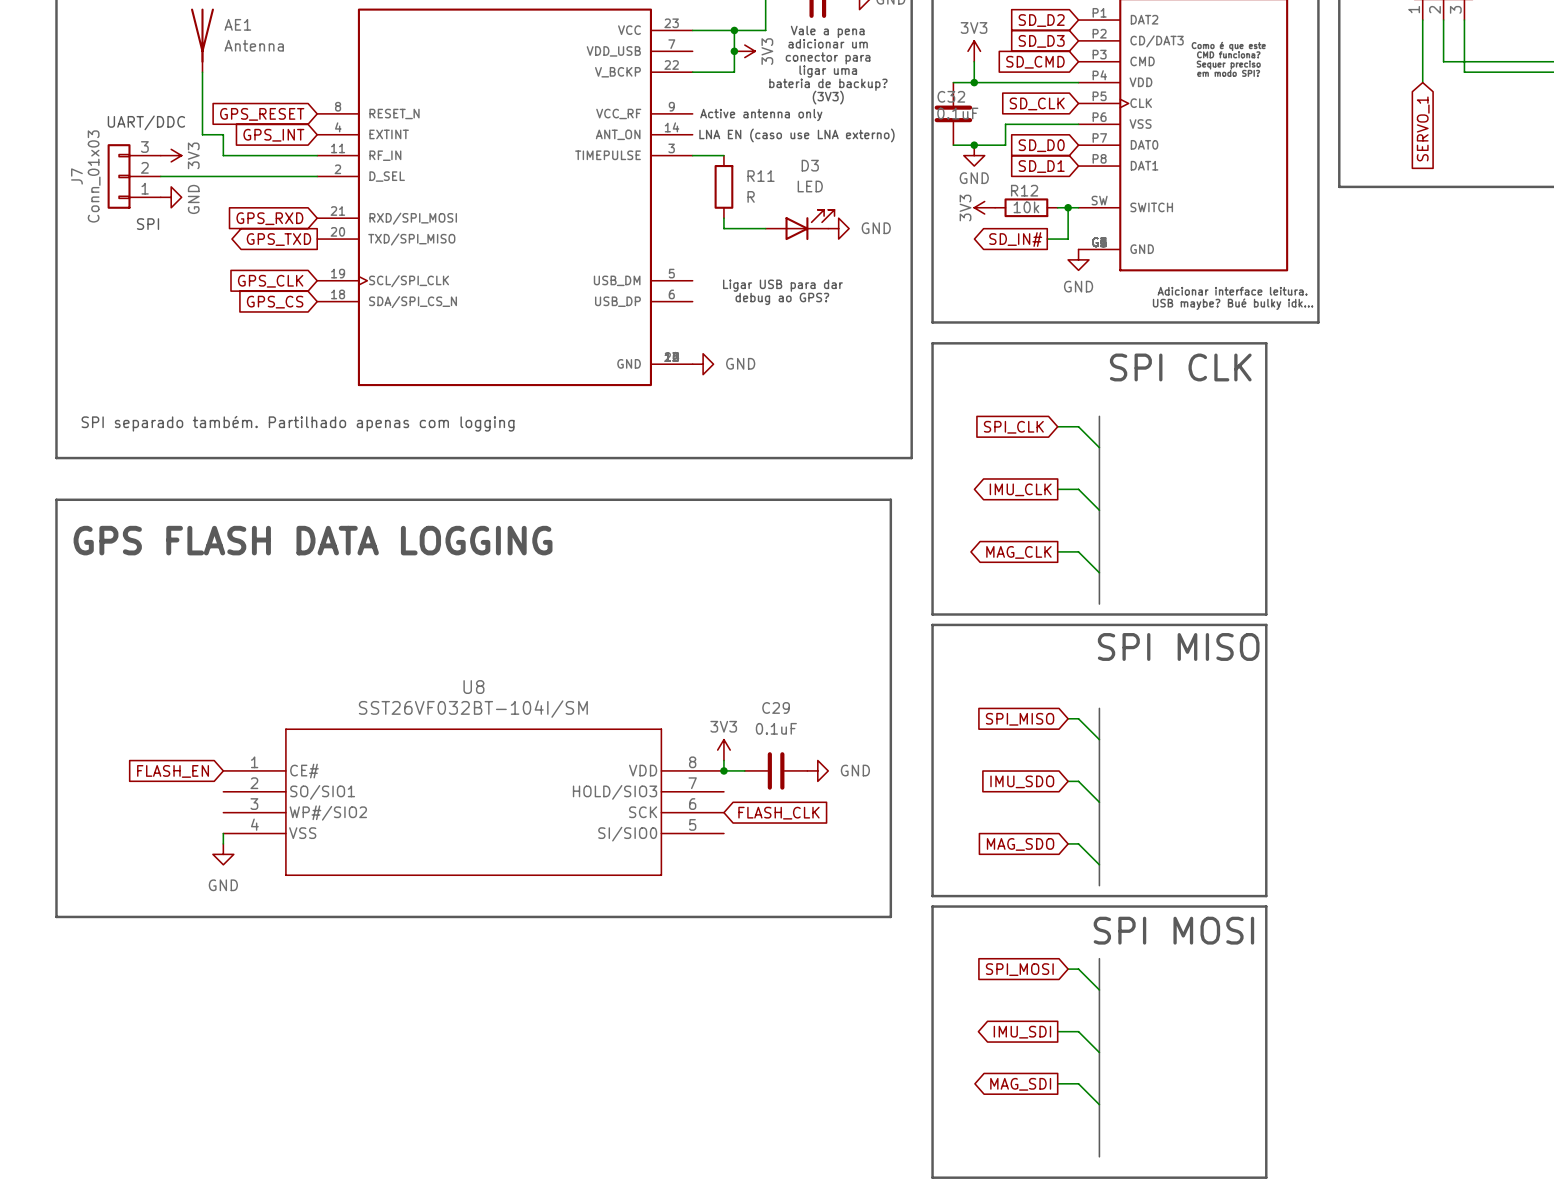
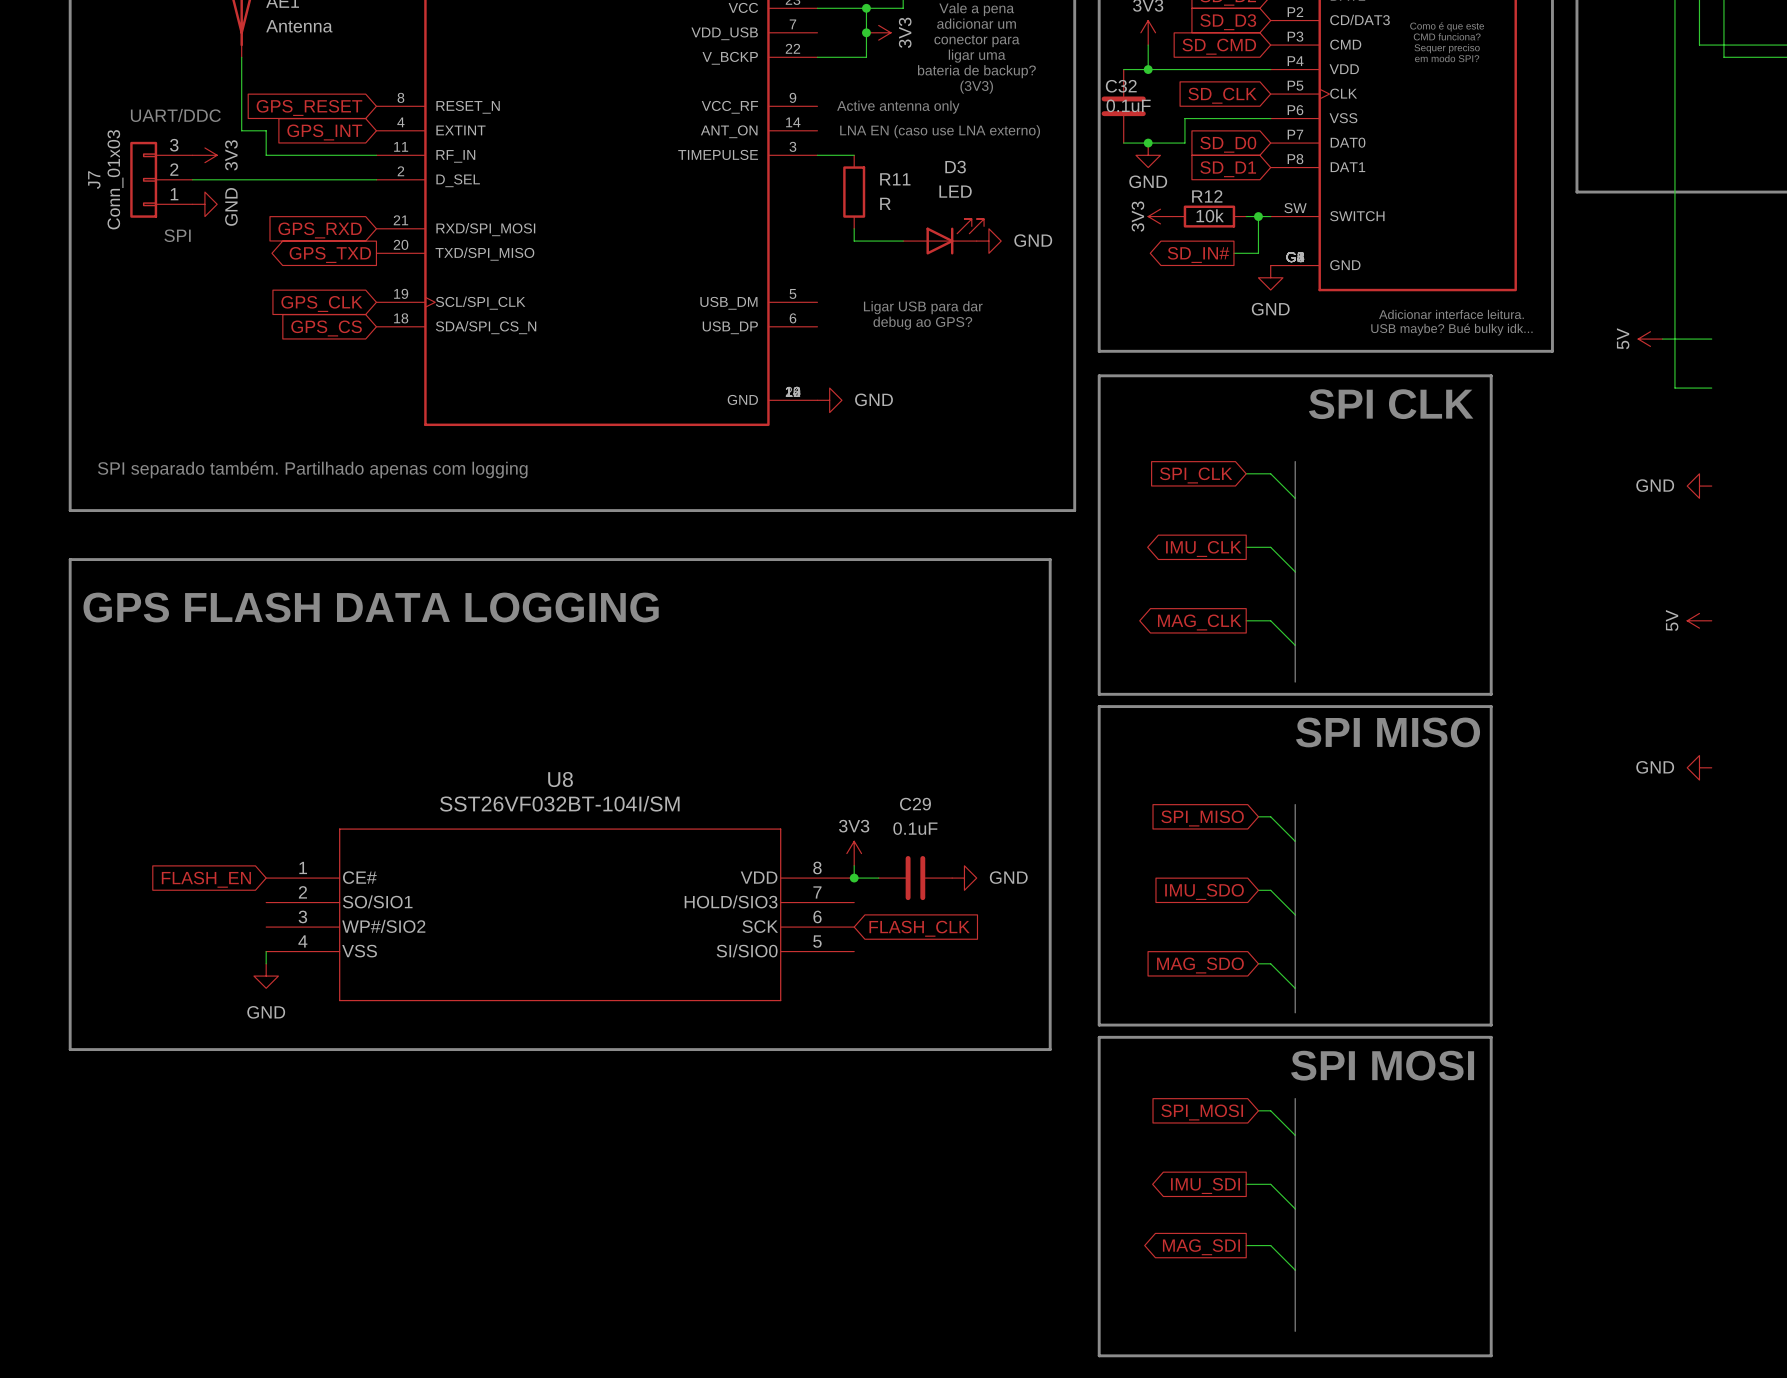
wire: none -> (1674, 69) (1674, 388) (1711, 388)
global label: SERVO_1 (1423, 128) -> none
power symbol: none -> 5V (1650, 339)
wire: none -> (1662, 339) (1711, 339)
power symbol: none -> GND (1699, 486)
power symbol: none -> 5V (1699, 620)
power symbol: none -> GND (1699, 767)

